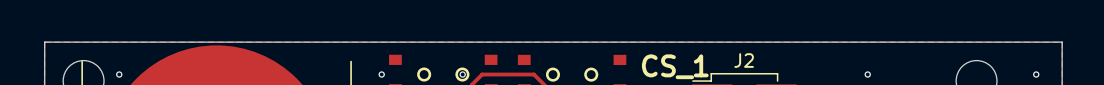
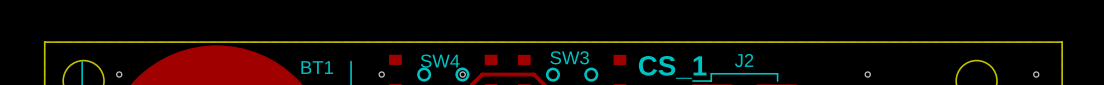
SW3 name: none -> SW3 (569, 57)
SW4 name: none -> SW4 (440, 61)
BT1 name: none -> BT1 (317, 67)

